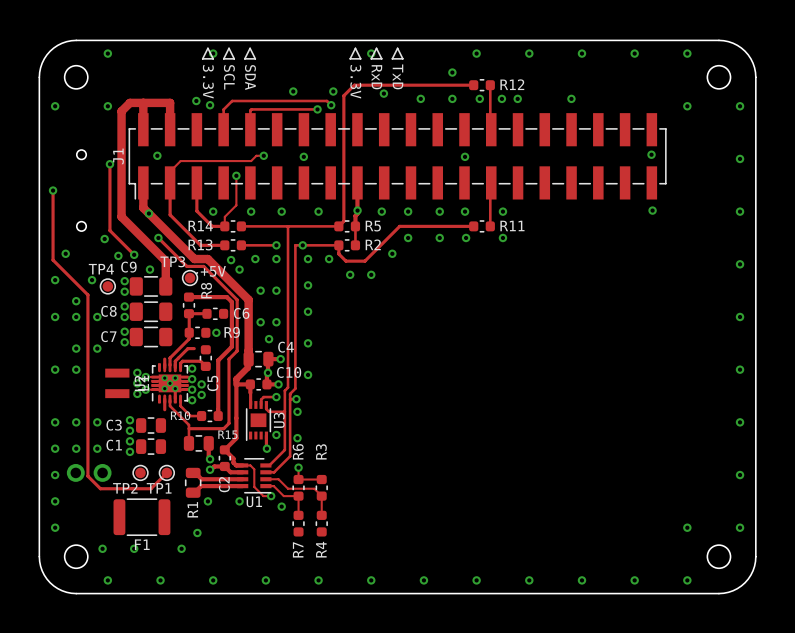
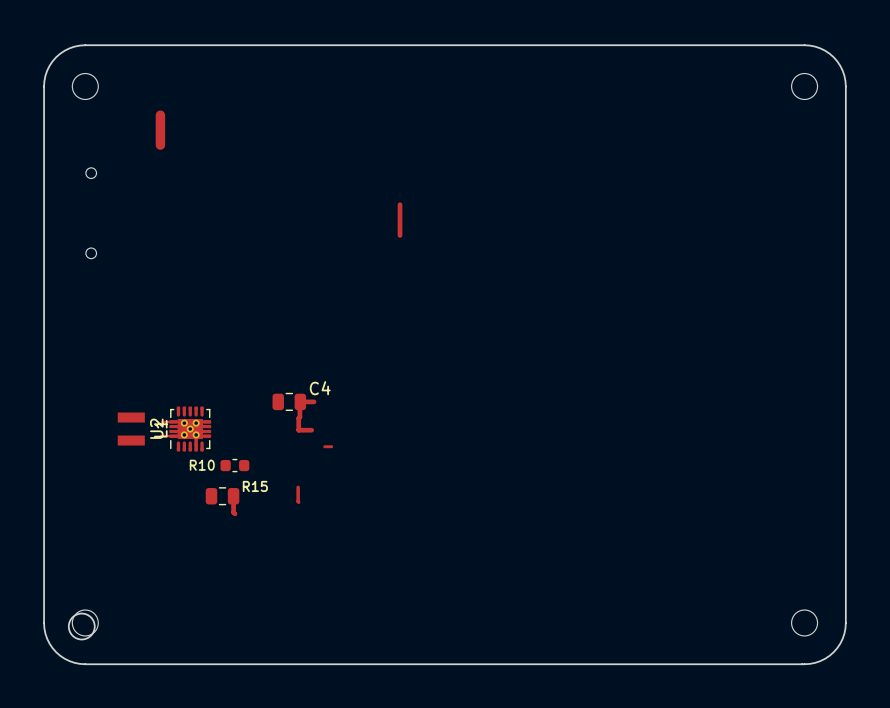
line: (207, 48) (202, 58) (213, 58) (207, 48) -> none
line: (229, 48) (234, 58) (223, 58) (229, 48) -> none
line: (250, 48) (255, 58) (244, 58) (250, 48) -> none
line: (355, 48) (350, 58) (360, 58) (355, 48) -> none
line: (376, 48) (381, 58) (371, 58) (376, 48) -> none
line: (397, 48) (392, 58) (402, 58) (397, 48) -> none
via: (107, 53) -> none
via: (213, 53) -> none
via: (371, 53) -> none
via: (476, 53) -> none
via: (529, 53) -> none
via: (581, 53) -> none
via: (634, 53) -> none
via: (687, 53) -> none
via: (452, 72) -> none
text: TxD (397, 76) -> none
text: SCL (229, 77) -> none
text: SDA (250, 77) -> none
text: RxD (376, 77) -> none
text: 3.3V (208, 81) -> none
text: 3.3V (355, 81) -> none
track: (473, 85) (354, 85) (343, 95) (343, 221) (338, 226) (241, 226) -> none
R12: (482, 85) -> none
track: (490, 85) (491, 129) -> none
via: (293, 91) -> none
via: (333, 91) -> none
via: (383, 93) -> none
via: (420, 98) -> none
via: (452, 98) -> none
via: (479, 98) -> none
via: (501, 98) -> none
via: (517, 98) -> none
via: (571, 98) -> none
via: (196, 100) -> none
via: (210, 105) -> none
track: (331, 105) (327, 100) (232, 100) (223, 109) (223, 129) -> none
via: (331, 105) -> none
via: (55, 106) -> none
via: (107, 106) -> none
via: (687, 106) -> none
via: (740, 106) -> none
track: (317, 109) (251, 109) (250, 129) -> none
via: (317, 109) -> none
track: (170, 129) (170, 102) (129, 102) (121, 111) (121, 216) (165, 261) (165, 286) -> none
via: (651, 154) -> none
via: (157, 155) -> none
track: (263, 155) (256, 155) (251, 161) (180, 161) (170, 171) (170, 214) (200, 245) (224, 245) -> none
via: (263, 155) -> none
via: (303, 156) -> none
J1: (397, 156) -> none
via: (465, 156) -> none
via: (740, 158) -> none
track: (109, 164) (109, 230) (134, 254) -> none
via: (109, 164) -> none
track: (236, 175) (236, 205) (224, 216) (224, 226) (212, 226) (196, 211) (196, 182) -> none
via: (236, 175) -> none
track: (143, 182) (143, 207) (194, 259) (207, 259) (248, 299) (248, 359) -> none
track: (491, 182) (490, 226) -> none
track: (53, 190) (53, 260) (87, 294) (87, 476) (100, 488) (151, 488) (166, 472) -> none
via: (53, 190) -> none
track: (357, 210) (355, 226) -> none
via: (357, 210) -> none
via: (652, 210) -> none
via: (213, 211) -> none
via: (251, 211) -> none
via: (281, 211) -> none
via: (318, 211) -> none
via: (381, 211) -> none
via: (408, 211) -> none
via: (439, 211) -> none
via: (465, 211) -> none
via: (502, 211) -> none
via: (740, 211) -> none
via: (148, 213) -> none
R14: (233, 226) -> none
track: (288, 226) (288, 387) (284, 390) (284, 449) (269, 465) (265, 465) -> none
R5: (347, 226) -> none
track: (355, 226) (355, 245) -> none
track: (473, 226) (399, 226) (364, 261) (345, 261) (338, 253) (338, 245) (295, 245) (295, 388) (290, 393) (290, 456) (274, 472) (265, 472) -> none
R11: (482, 226) -> none
track: (158, 237) (186, 266) (203, 266) (237, 299) (237, 350) (229, 359) (229, 423) (223, 428) (188, 428) -> none
via: (158, 237) -> none
via: (408, 237) -> none
via: (439, 237) -> none
via: (466, 237) -> none
via: (502, 237) -> none
via: (104, 239) -> none
R13: (233, 245) -> none
track: (241, 245) (276, 245) -> none
via: (276, 245) -> none
via: (302, 245) -> none
R2: (347, 245) -> none
via: (65, 253) -> none
via: (392, 253) -> none
via: (134, 254) -> none
via: (118, 255) -> none
via: (255, 259) -> none
via: (276, 259) -> none
via: (308, 259) -> none
via: (329, 259) -> none
via: (231, 260) -> none
via: (740, 264) -> none
via: (149, 269) -> none
via: (239, 269) -> none
text: +5V (213, 271) -> none
line: (197, 272) (196, 273) -> none
via: (350, 274) -> none
via: (371, 274) -> none
TP3: (190, 278) -> none
via: (55, 280) -> none
via: (92, 280) -> none
via: (124, 281) -> none
via: (308, 285) -> none
TP4: (107, 286) -> none
C9: (151, 286) -> none
via: (260, 290) -> none
via: (276, 290) -> none
via: (124, 291) -> none
track: (188, 297) (226, 297) (231, 302) (231, 346) (218, 360) (218, 416) -> none
via: (76, 301) -> none
R8: (188, 305) -> none
via: (124, 306) -> none
C8: (151, 311) -> none
via: (308, 311) -> none
track: (206, 313) (188, 313) (189, 338) (170, 358) (170, 364) -> none
C6: (215, 313) -> none
via: (55, 316) -> none
via: (76, 316) -> none
via: (97, 316) -> none
via: (124, 316) -> none
via: (740, 316) -> none
via: (260, 322) -> none
via: (276, 322) -> none
via: (124, 331) -> none
R9: (197, 332) -> none
via: (216, 332) -> none
C7: (151, 337) -> none
via: (269, 339) -> none
via: (124, 342) -> none
via: (308, 343) -> none
via: (76, 348) -> none
via: (97, 348) -> none
track: (194, 348) (187, 348) (175, 361) (175, 367) -> none
C5: (205, 358) -> none
track: (164, 359) (164, 367) -> none
track: (247, 359) (247, 367) (236, 379) (236, 384) -> none
via: (280, 359) -> none
track: (205, 366) (200, 361) (182, 361) (180, 367) -> none
via: (192, 368) -> none
via: (55, 369) -> none
via: (76, 369) -> none
via: (740, 369) -> none
via: (137, 372) -> none
via: (268, 372) -> none
via: (308, 374) -> none
via: (145, 377) -> none
via: (192, 379) -> none
via: (137, 383) -> none
via: (201, 384) -> none
track: (236, 384) (250, 384) (250, 404) -> none
track: (236, 384) (236, 438) (224, 449) (233, 458) (233, 462) (236, 465) (250, 465) (254, 469) (254, 486) (263, 496) (271, 496) -> none
C10: (258, 384) -> none
via: (278, 384) -> none
via: (145, 389) -> none
via: (192, 389) -> none
via: (137, 393) -> none
via: (201, 394) -> none
track: (276, 397) (263, 397) (261, 399) (261, 404) -> none
via: (276, 397) -> none
track: (164, 398) (164, 409) -> none
track: (170, 398) (170, 406) (188, 424) (188, 443) -> none
track: (180, 398) (180, 406) (190, 416) (201, 416) -> none
via: (296, 399) -> none
via: (192, 400) -> none
track: (266, 404) (266, 409) (269, 411) (284, 411) -> none
via: (297, 411) -> none
via: (129, 420) -> none
U3: (258, 421) -> none
via: (55, 422) -> none
via: (76, 422) -> none
via: (97, 422) -> none
via: (740, 422) -> none
C3: (151, 425) -> none
via: (129, 430) -> none
via: (276, 435) -> none
via: (297, 438) -> none
via: (129, 441) -> none
C1: (151, 446) -> none
via: (55, 448) -> none
via: (76, 448) -> none
via: (97, 448) -> none
via: (266, 448) -> none
via: (129, 451) -> none
C2: (224, 458) -> none
via: (210, 459) -> none
track: (298, 467) (298, 479) (321, 479) -> none
via: (298, 467) -> none
track: (210, 469) (214, 466) (224, 466) (230, 472) (242, 472) -> none
via: (210, 469) -> none
part: (89, 472) -> none
TP2: (140, 472) -> none
TP1: (166, 472) -> none
track: (193, 472) (201, 479) (242, 479) -> none
via: (55, 475) -> none
U1: (254, 475) -> none
via: (740, 475) -> none
track: (265, 479) (278, 479) (288, 488) (314, 488) (321, 496) (321, 515) -> none
R1: (193, 482) -> none
track: (242, 486) (201, 486) (193, 492) -> none
track: (265, 486) (273, 486) (283, 496) (298, 496) (298, 515) -> none
R6: (298, 487) -> none
R3: (321, 487) -> none
via: (271, 496) -> none
via: (55, 501) -> none
via: (207, 501) -> none
via: (239, 501) -> none
via: (281, 506) -> none
F1: (141, 517) -> none
R7: (298, 523) -> none
R4: (321, 523) -> none
via: (55, 527) -> none
via: (687, 527) -> none
via: (740, 527) -> none
via: (197, 532) -> none
round board edge: none -> [67, 612, 96, 641]
via: (102, 548) -> none
via: (134, 548) -> none
via: (181, 548) -> none
via: (107, 580) -> none
via: (160, 580) -> none
via: (213, 580) -> none
via: (265, 580) -> none
via: (318, 580) -> none
via: (371, 580) -> none
via: (423, 580) -> none
via: (476, 580) -> none
via: (529, 580) -> none
via: (581, 580) -> none
via: (634, 580) -> none
via: (687, 580) -> none

